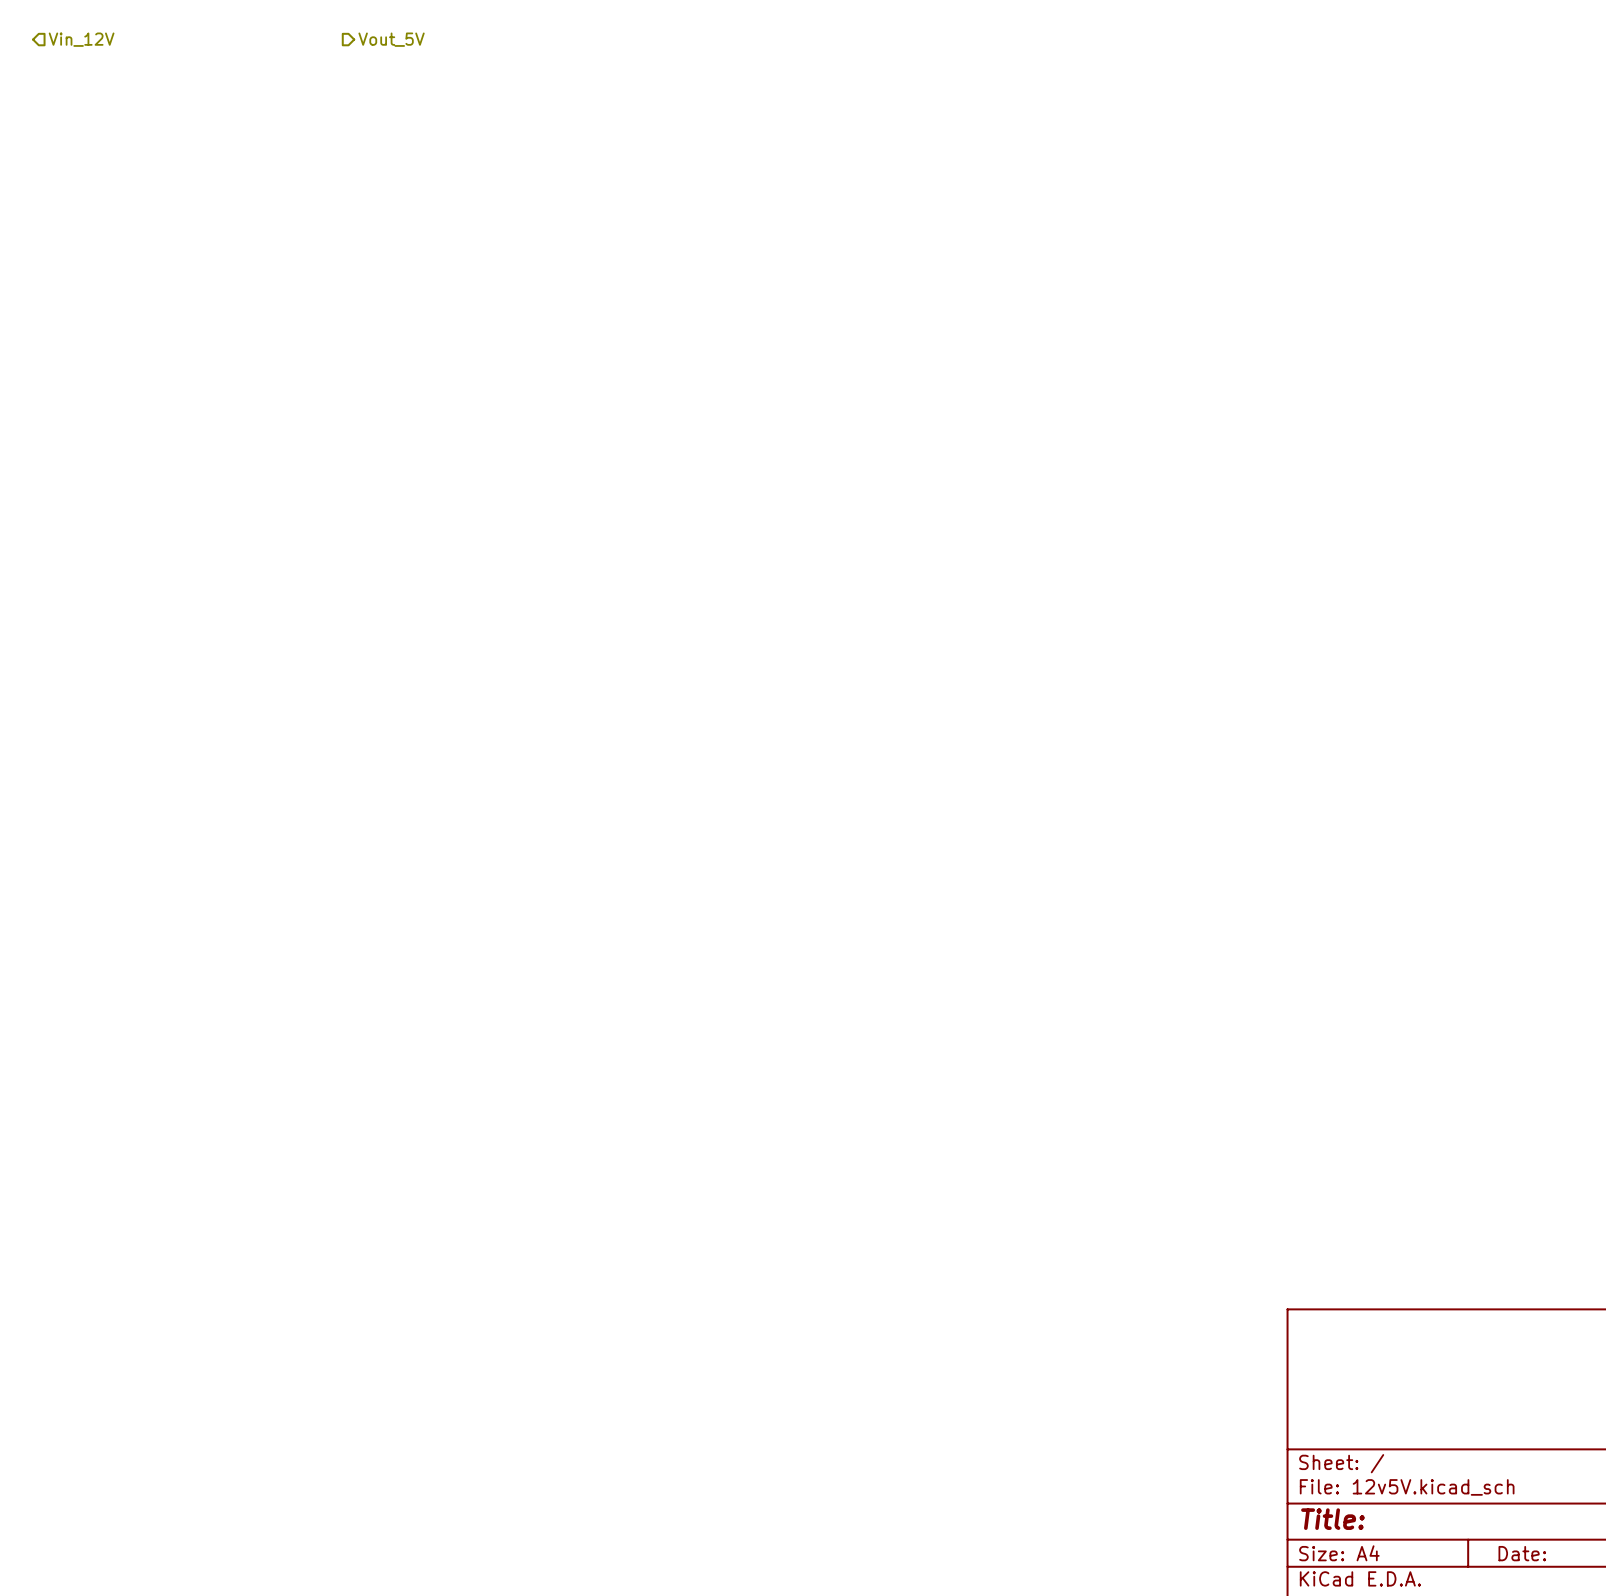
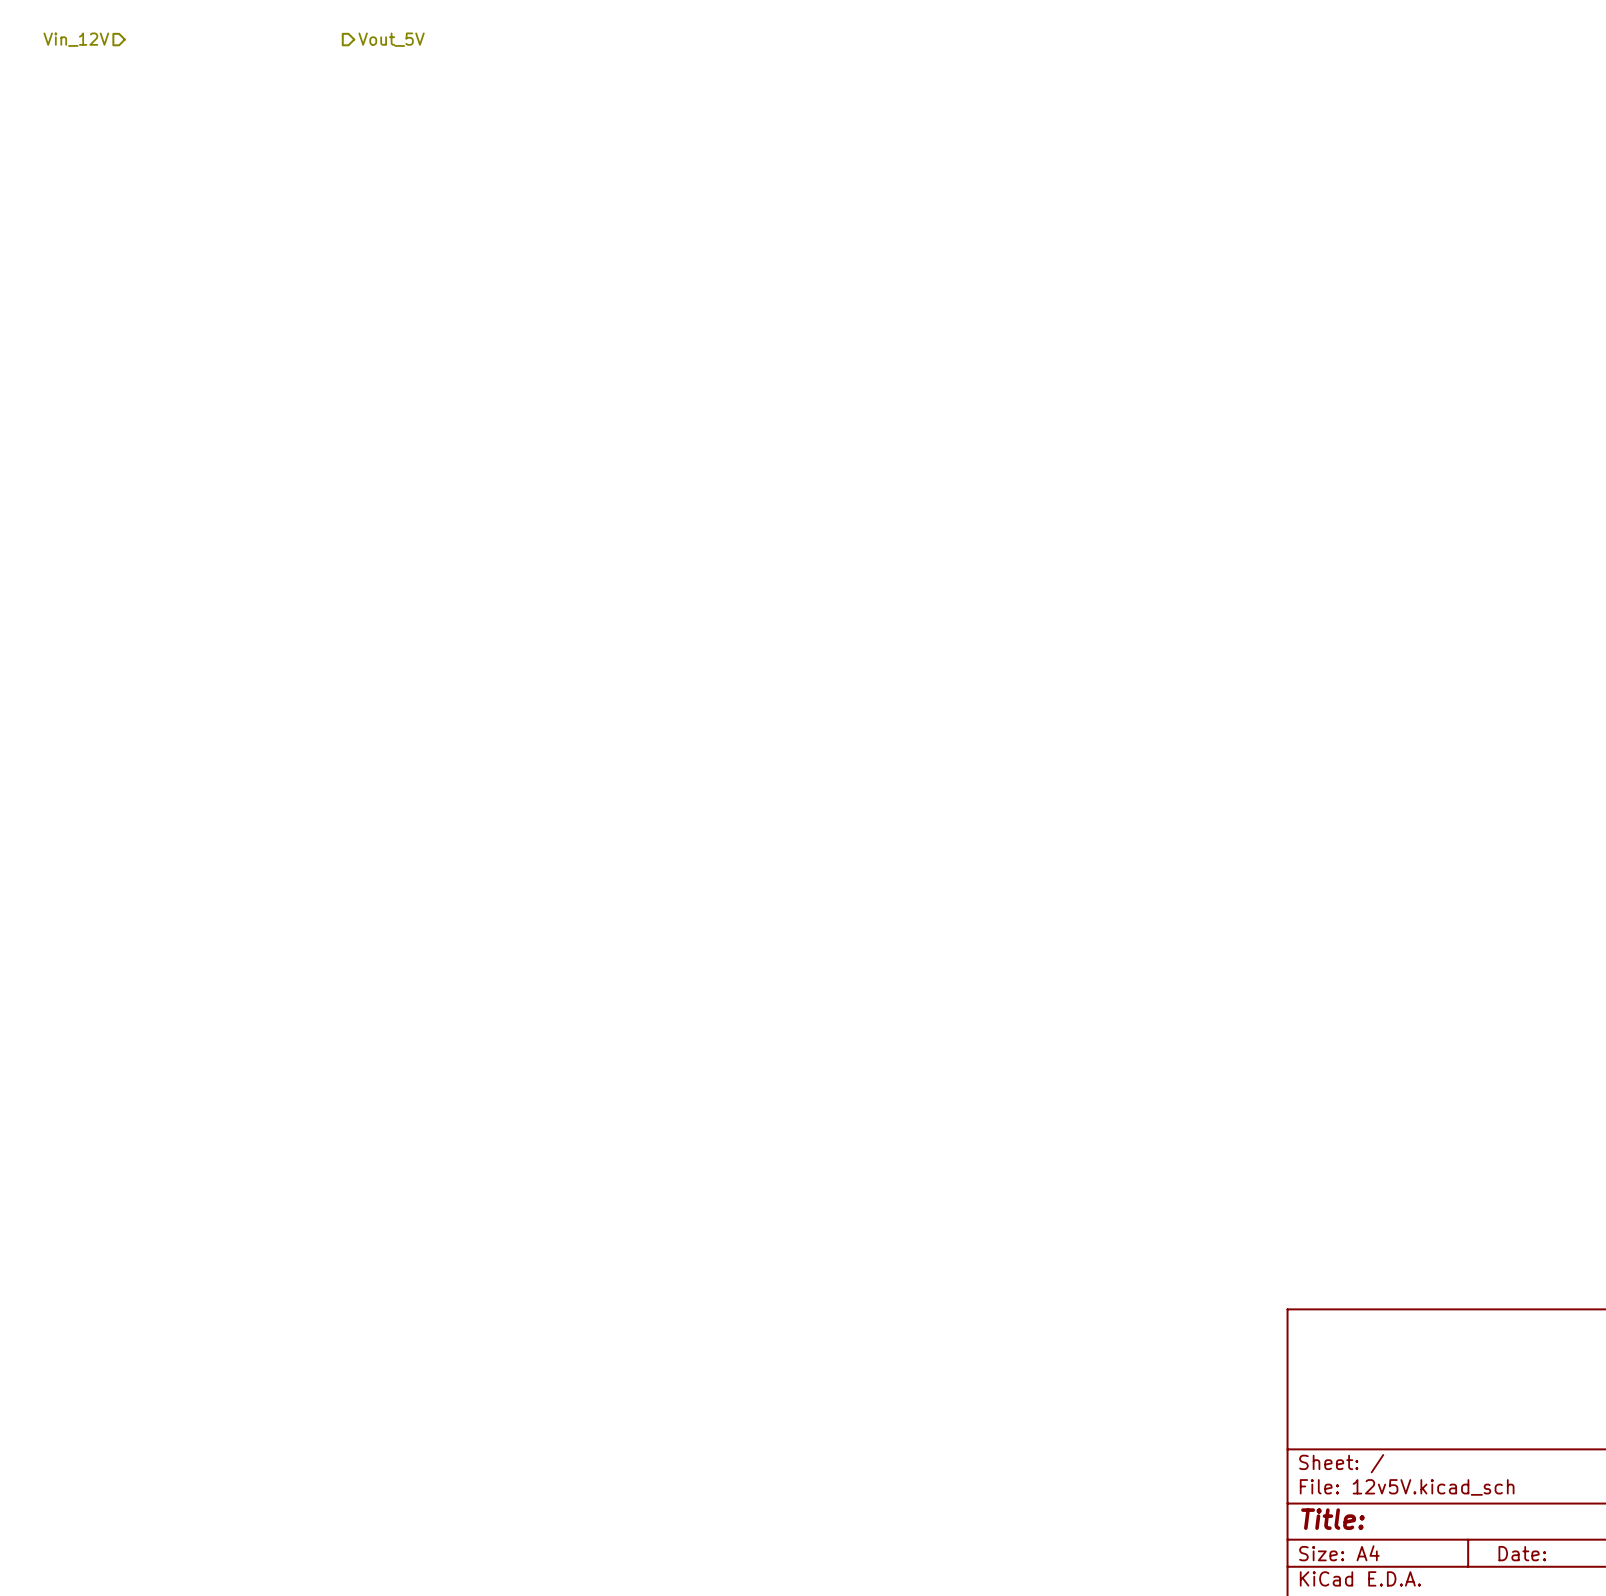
hierarchical label rotation: 0° (81, 39) -> 180° (76, 39)

